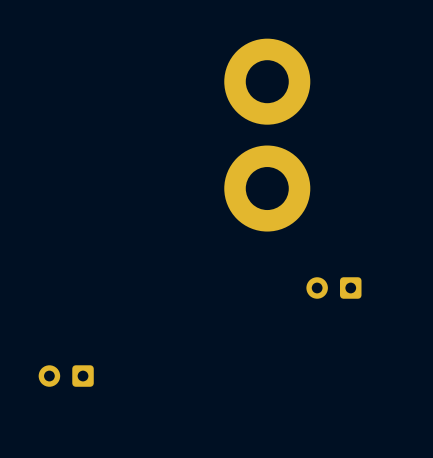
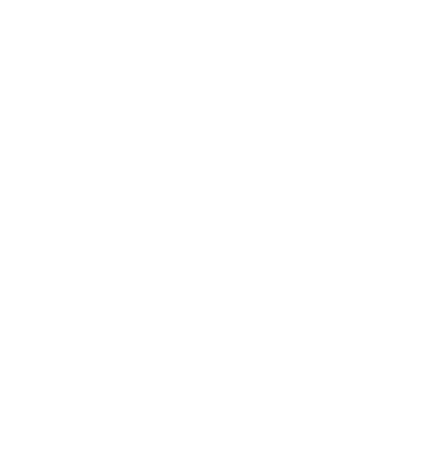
part: (267, 81) -> none
part: (267, 188) -> none
part: (333, 287) -> none
part: (66, 376) -> none

